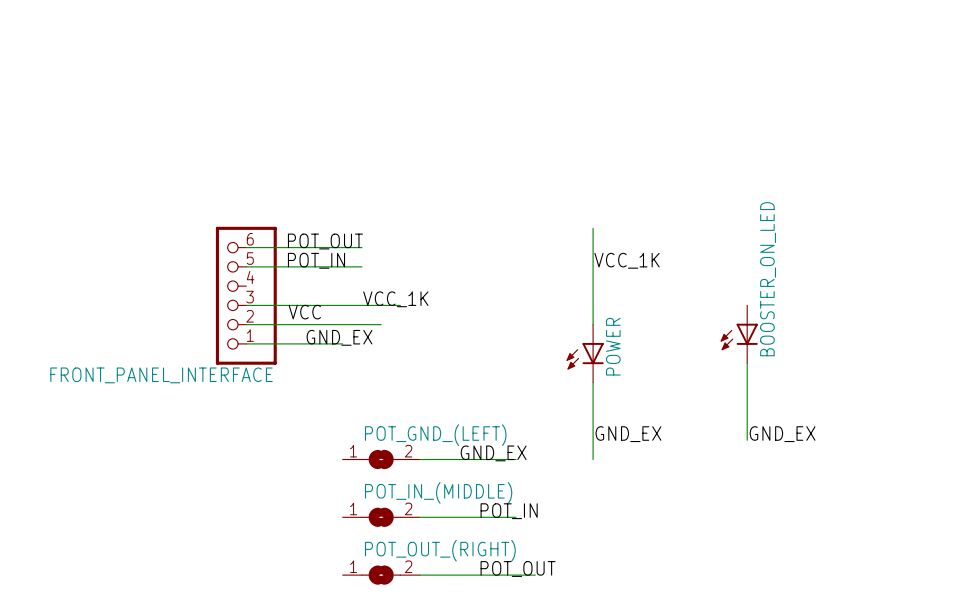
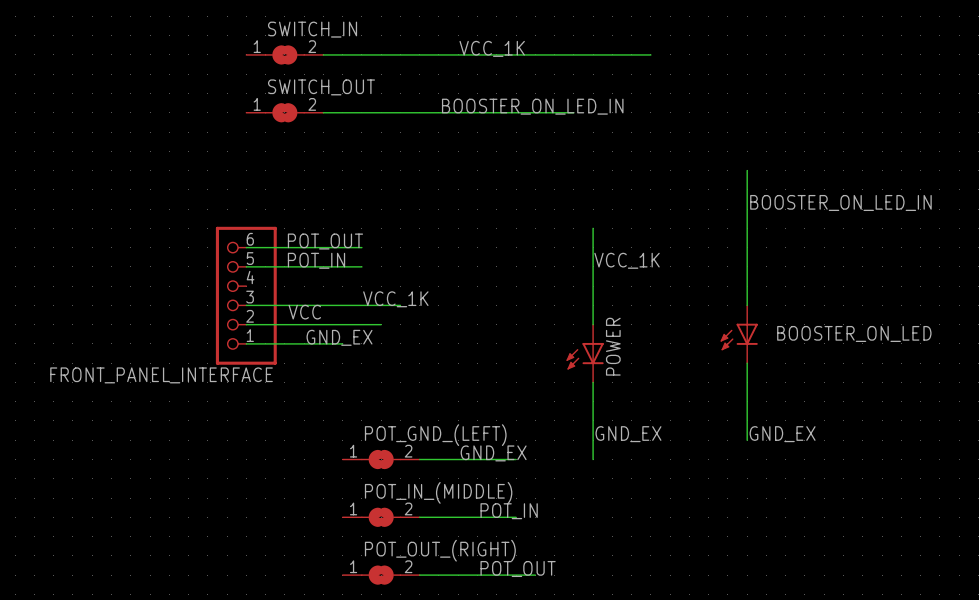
label: none -> VCC_1K (492, 48)
SWITCH_IN: none -> (284, 54)
wire: none -> (323, 54) (650, 54)
label: none -> BOOSTER_ON_LED_IN (532, 106)
SWITCH_OUT: none -> (284, 112)
wire: none -> (323, 112) (573, 112)
wire: none -> (747, 170) (747, 305)
label: none -> BOOSTER_ON_LED_IN (840, 202)
BOOSTER_ON_LED name rotation: 0° (768, 279) -> 90° clockwise (854, 333)

